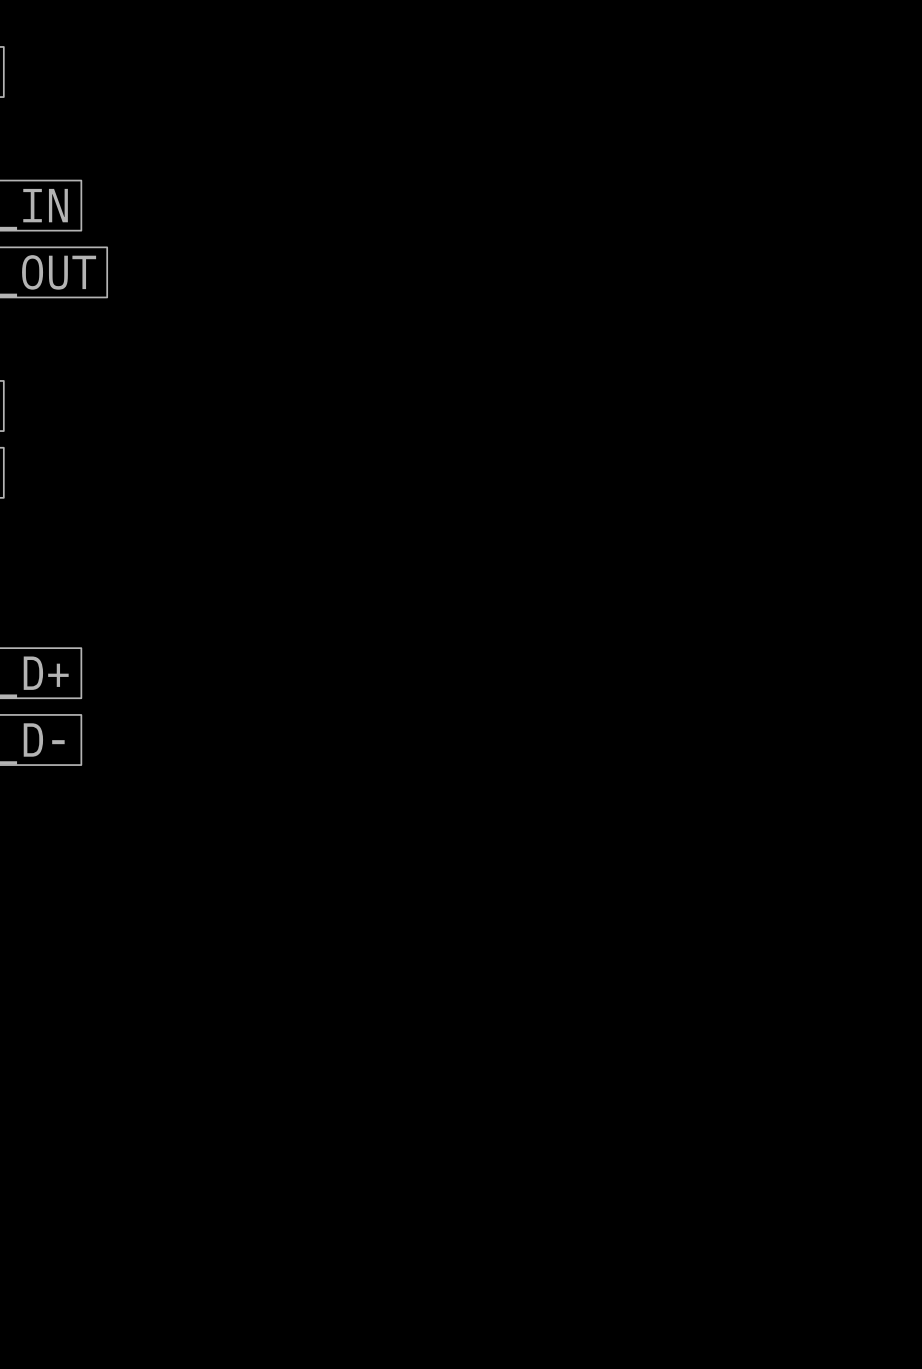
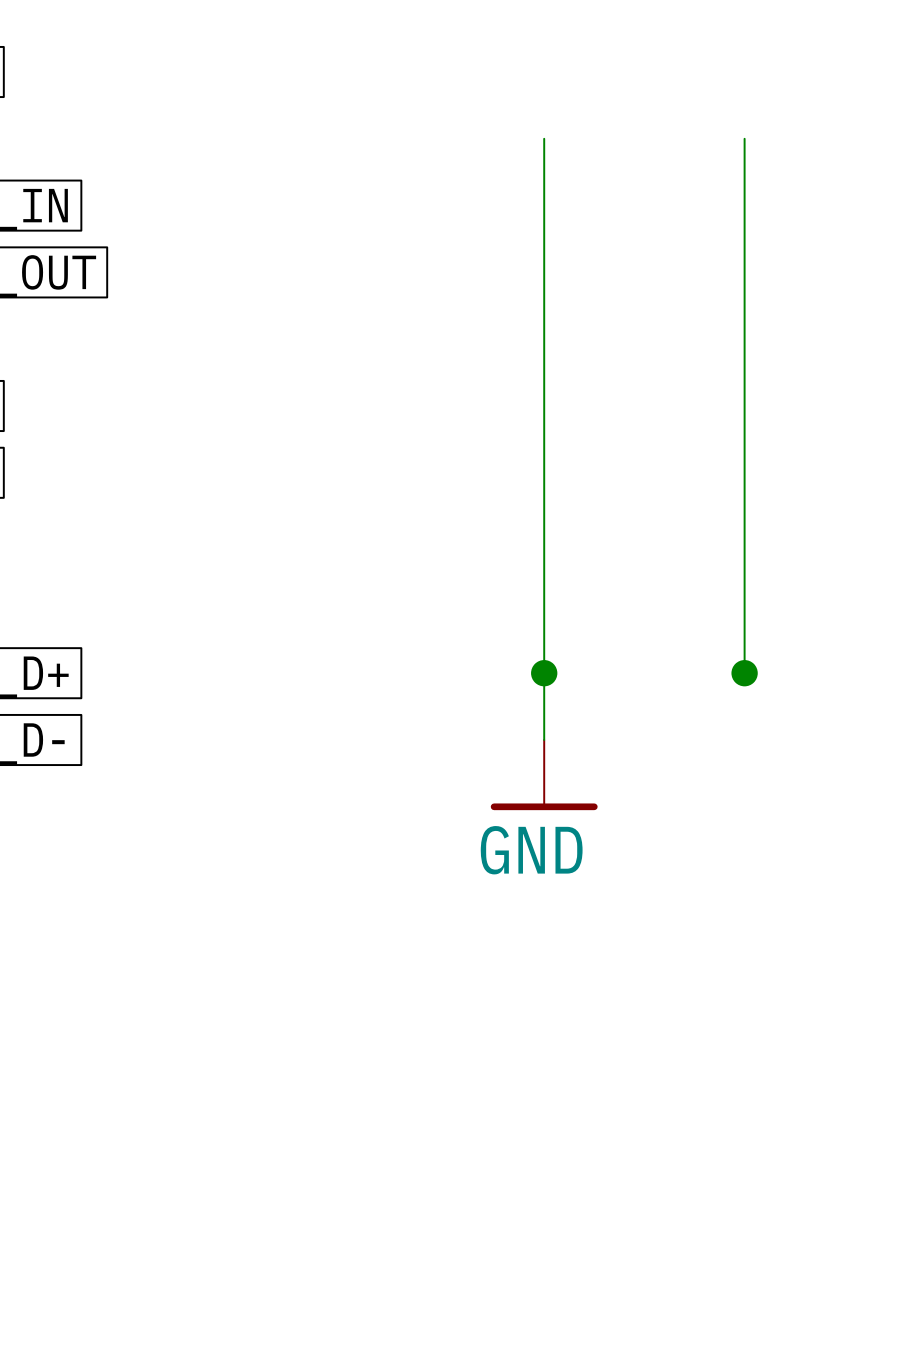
wire: none -> (544, 138) (544, 740)
wire: none -> (744, 138) (744, 673)
junction: none -> (544, 673)
junction: none -> (744, 673)
power symbol: none -> GND (544, 775)

